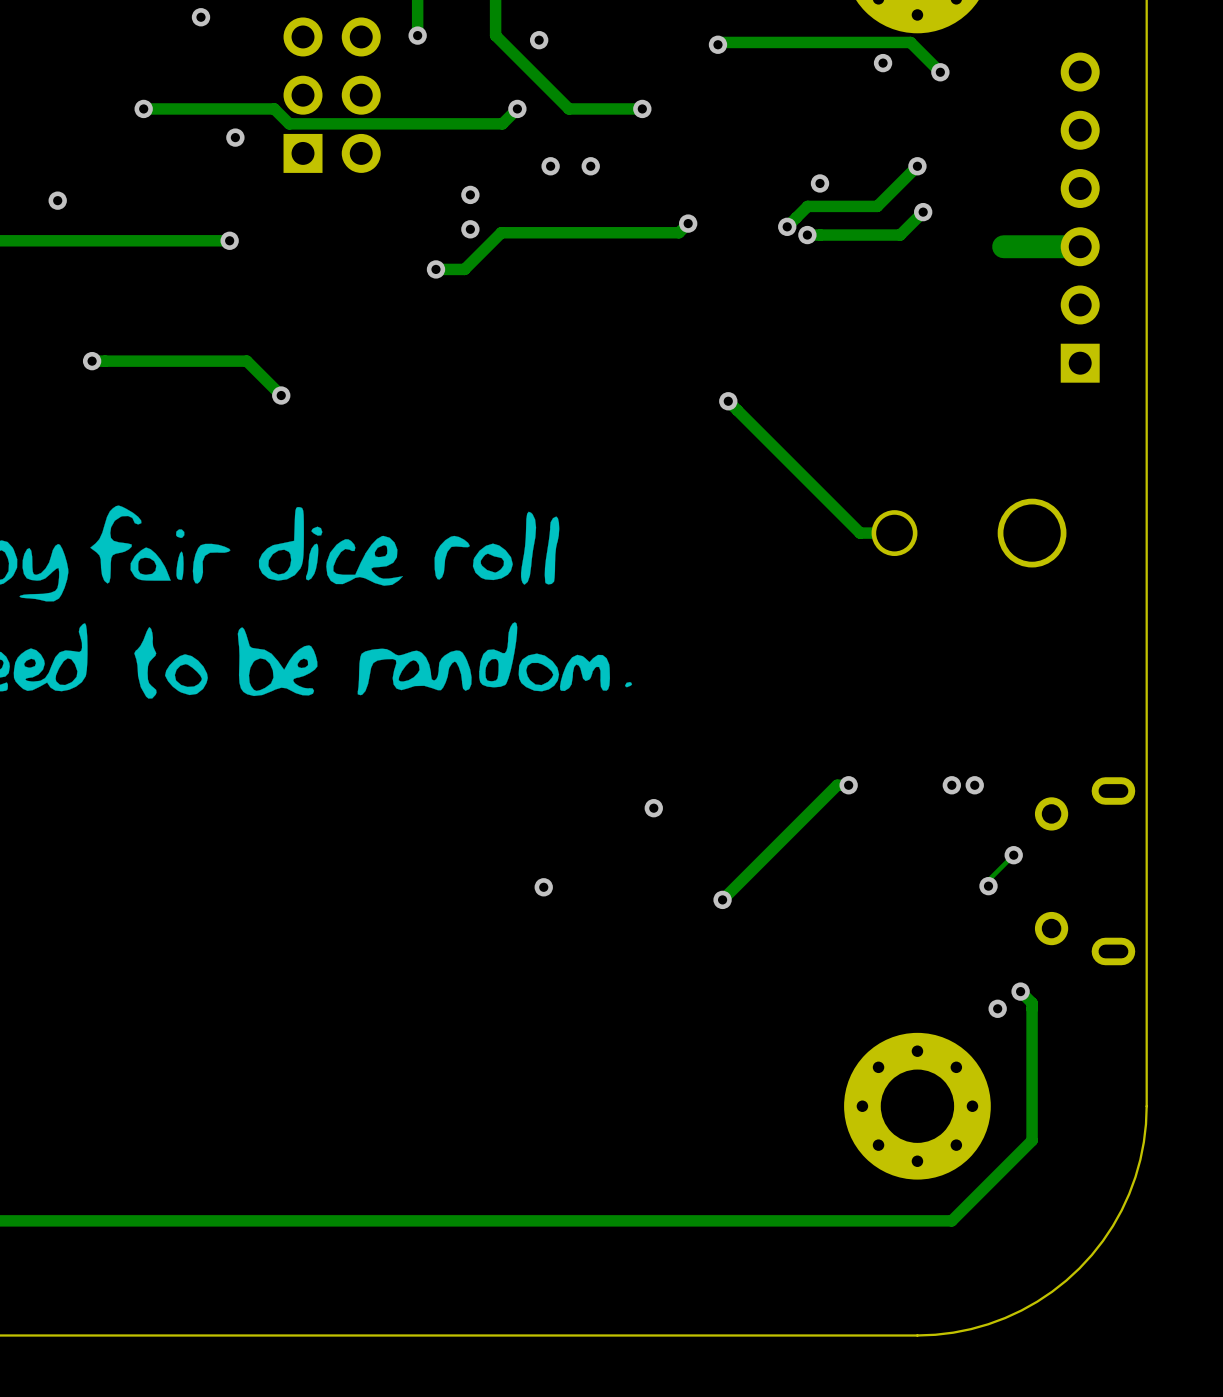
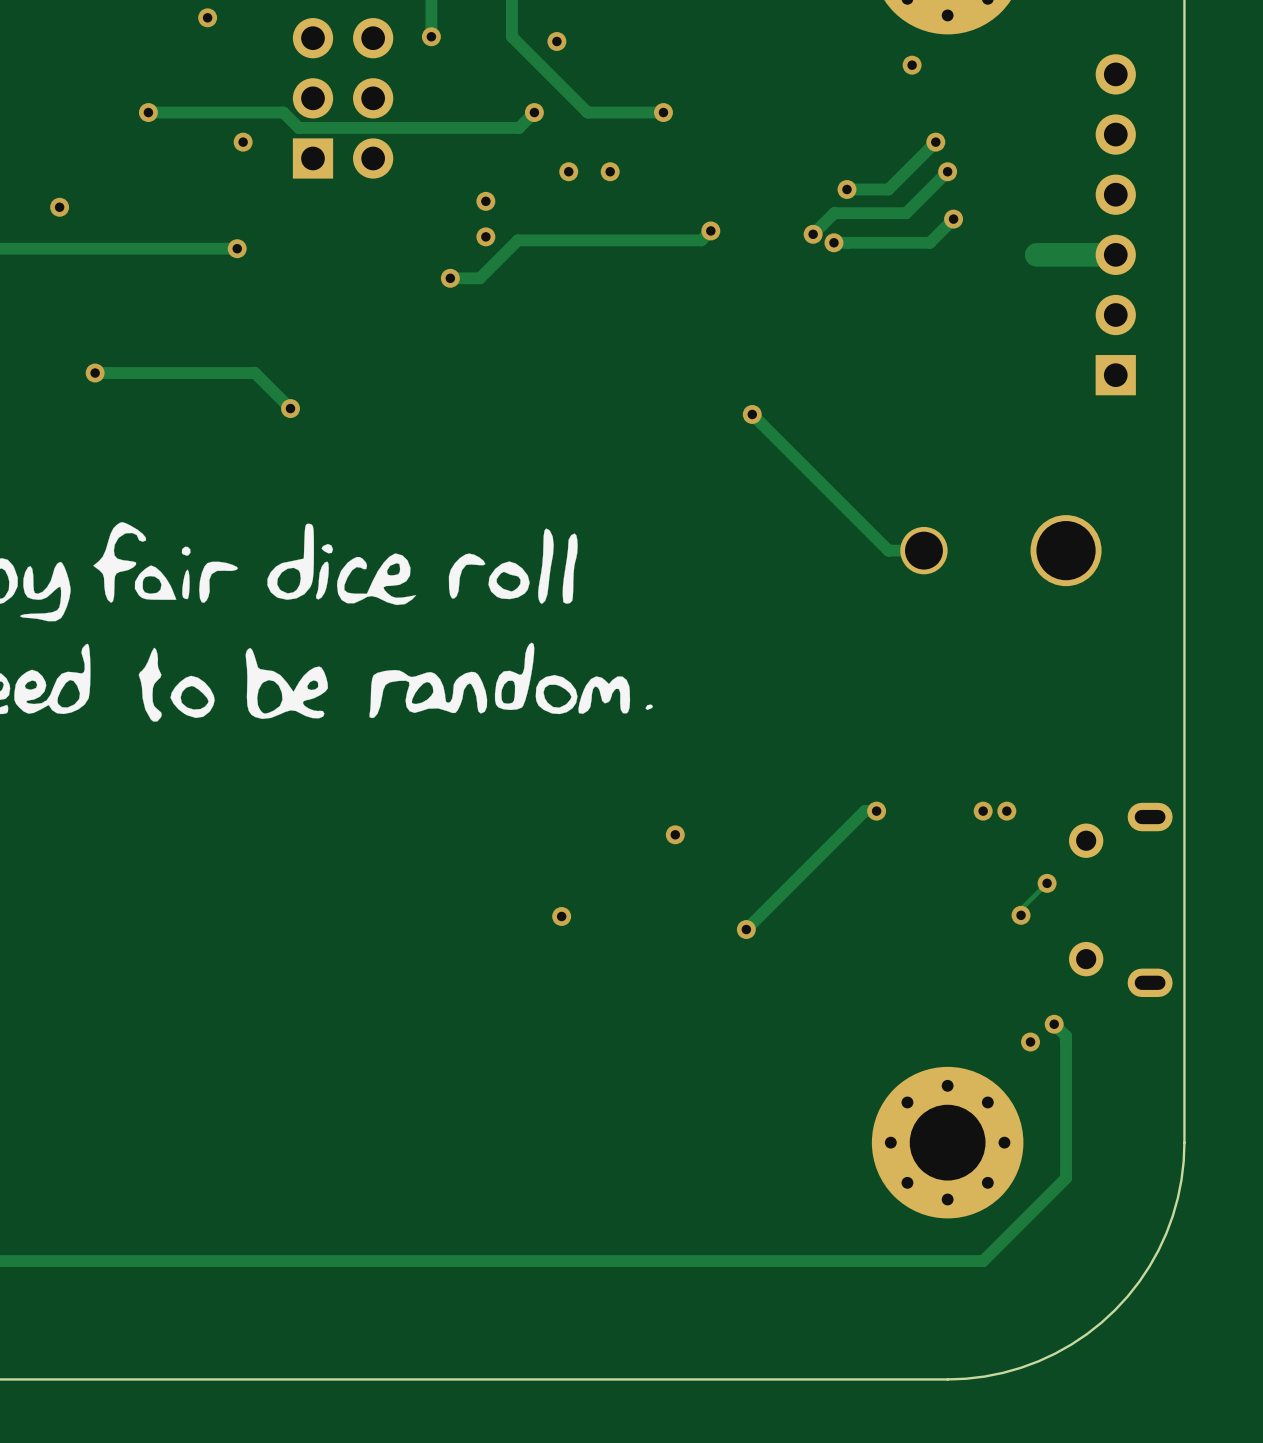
track: (717, 44) (720, 42) (910, 42) (940, 72) -> none
via: (717, 44) -> none
via: (940, 72) -> none
track: none -> (935, 142) (888, 189) (847, 189)
via: none -> (935, 142)

